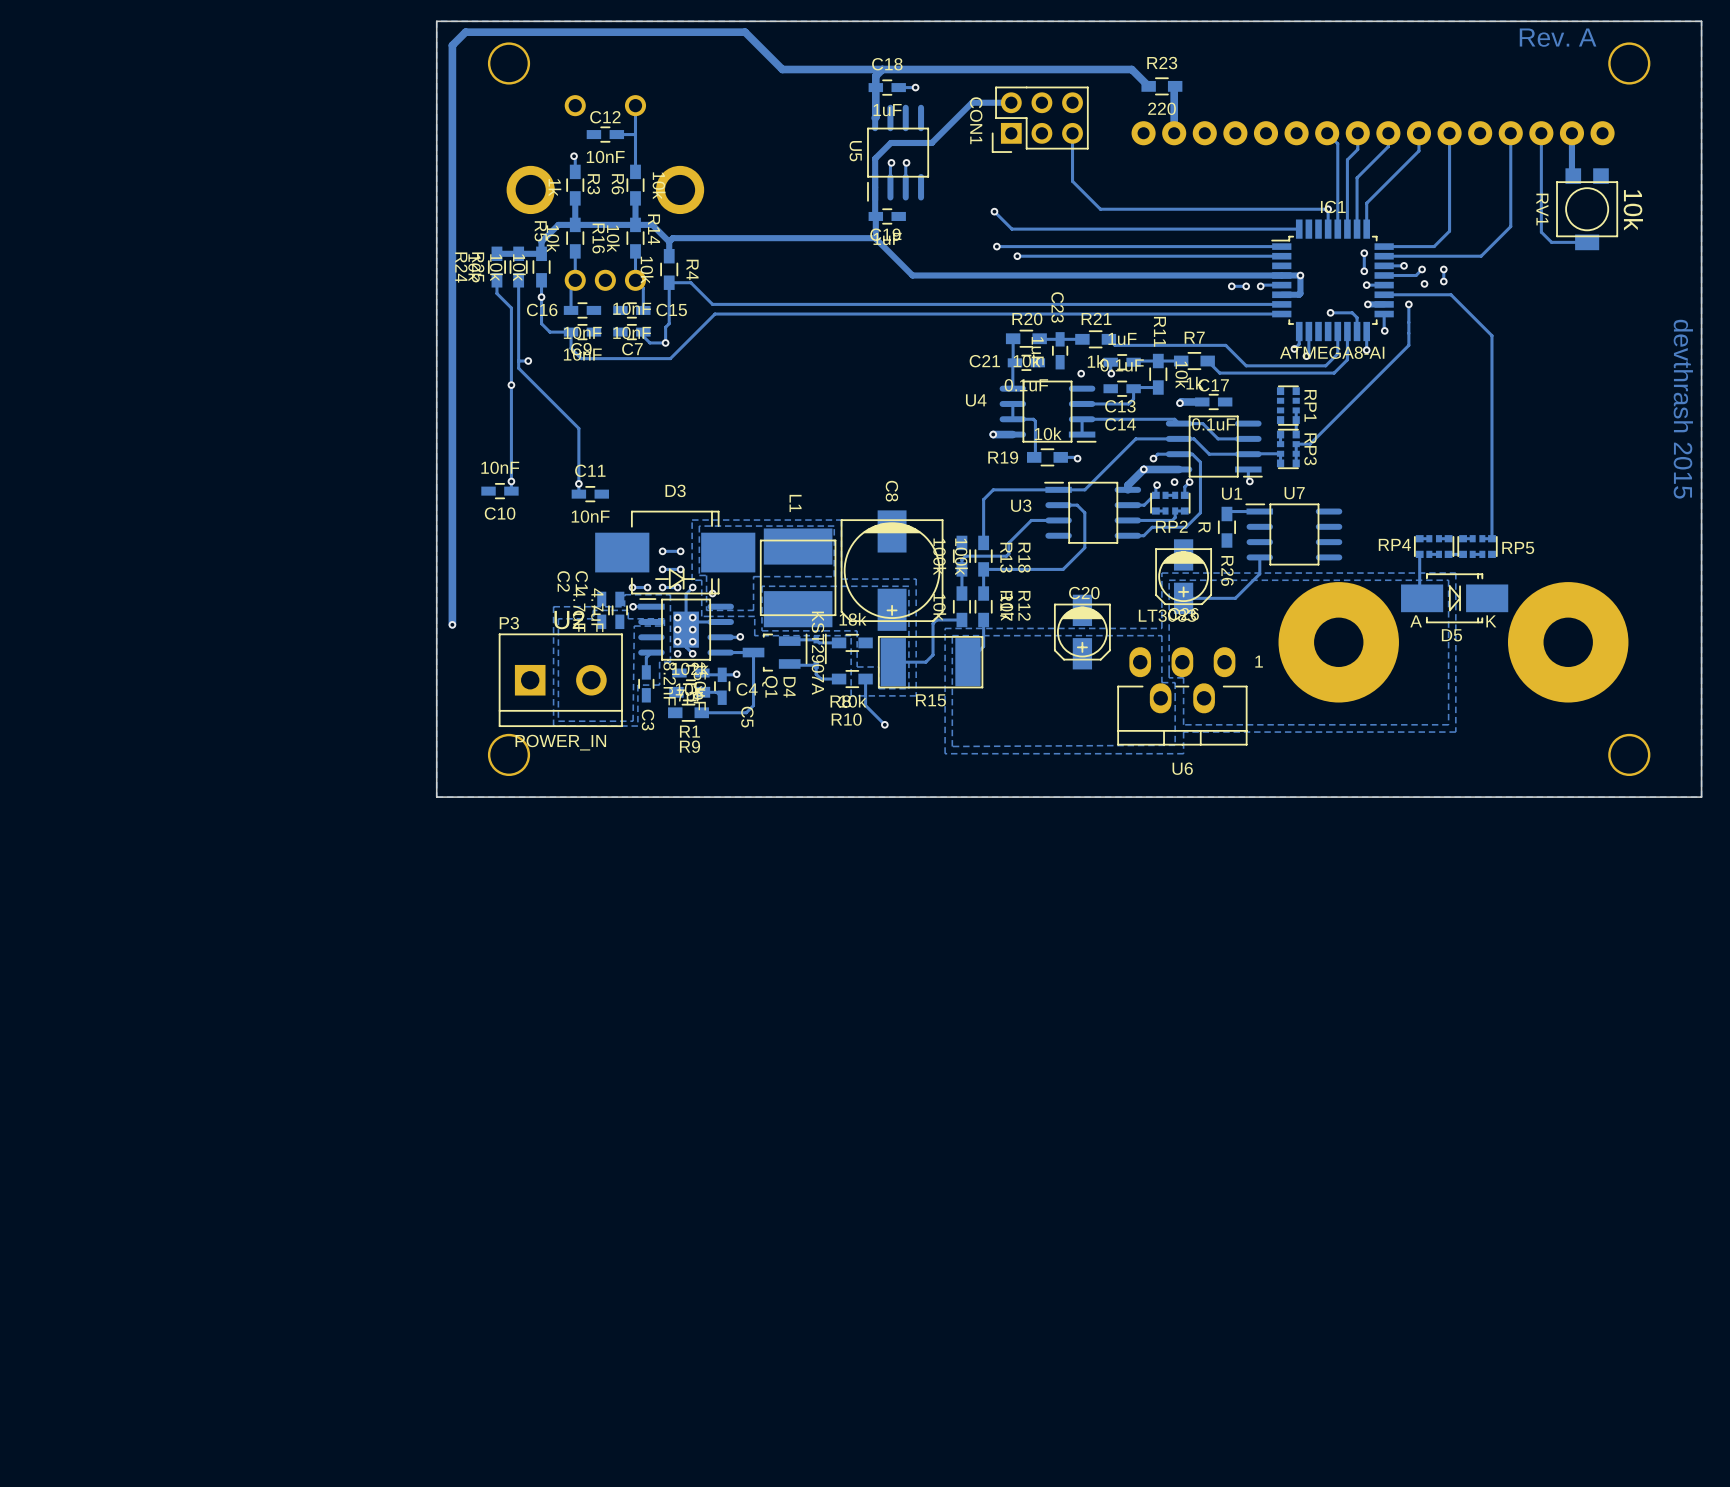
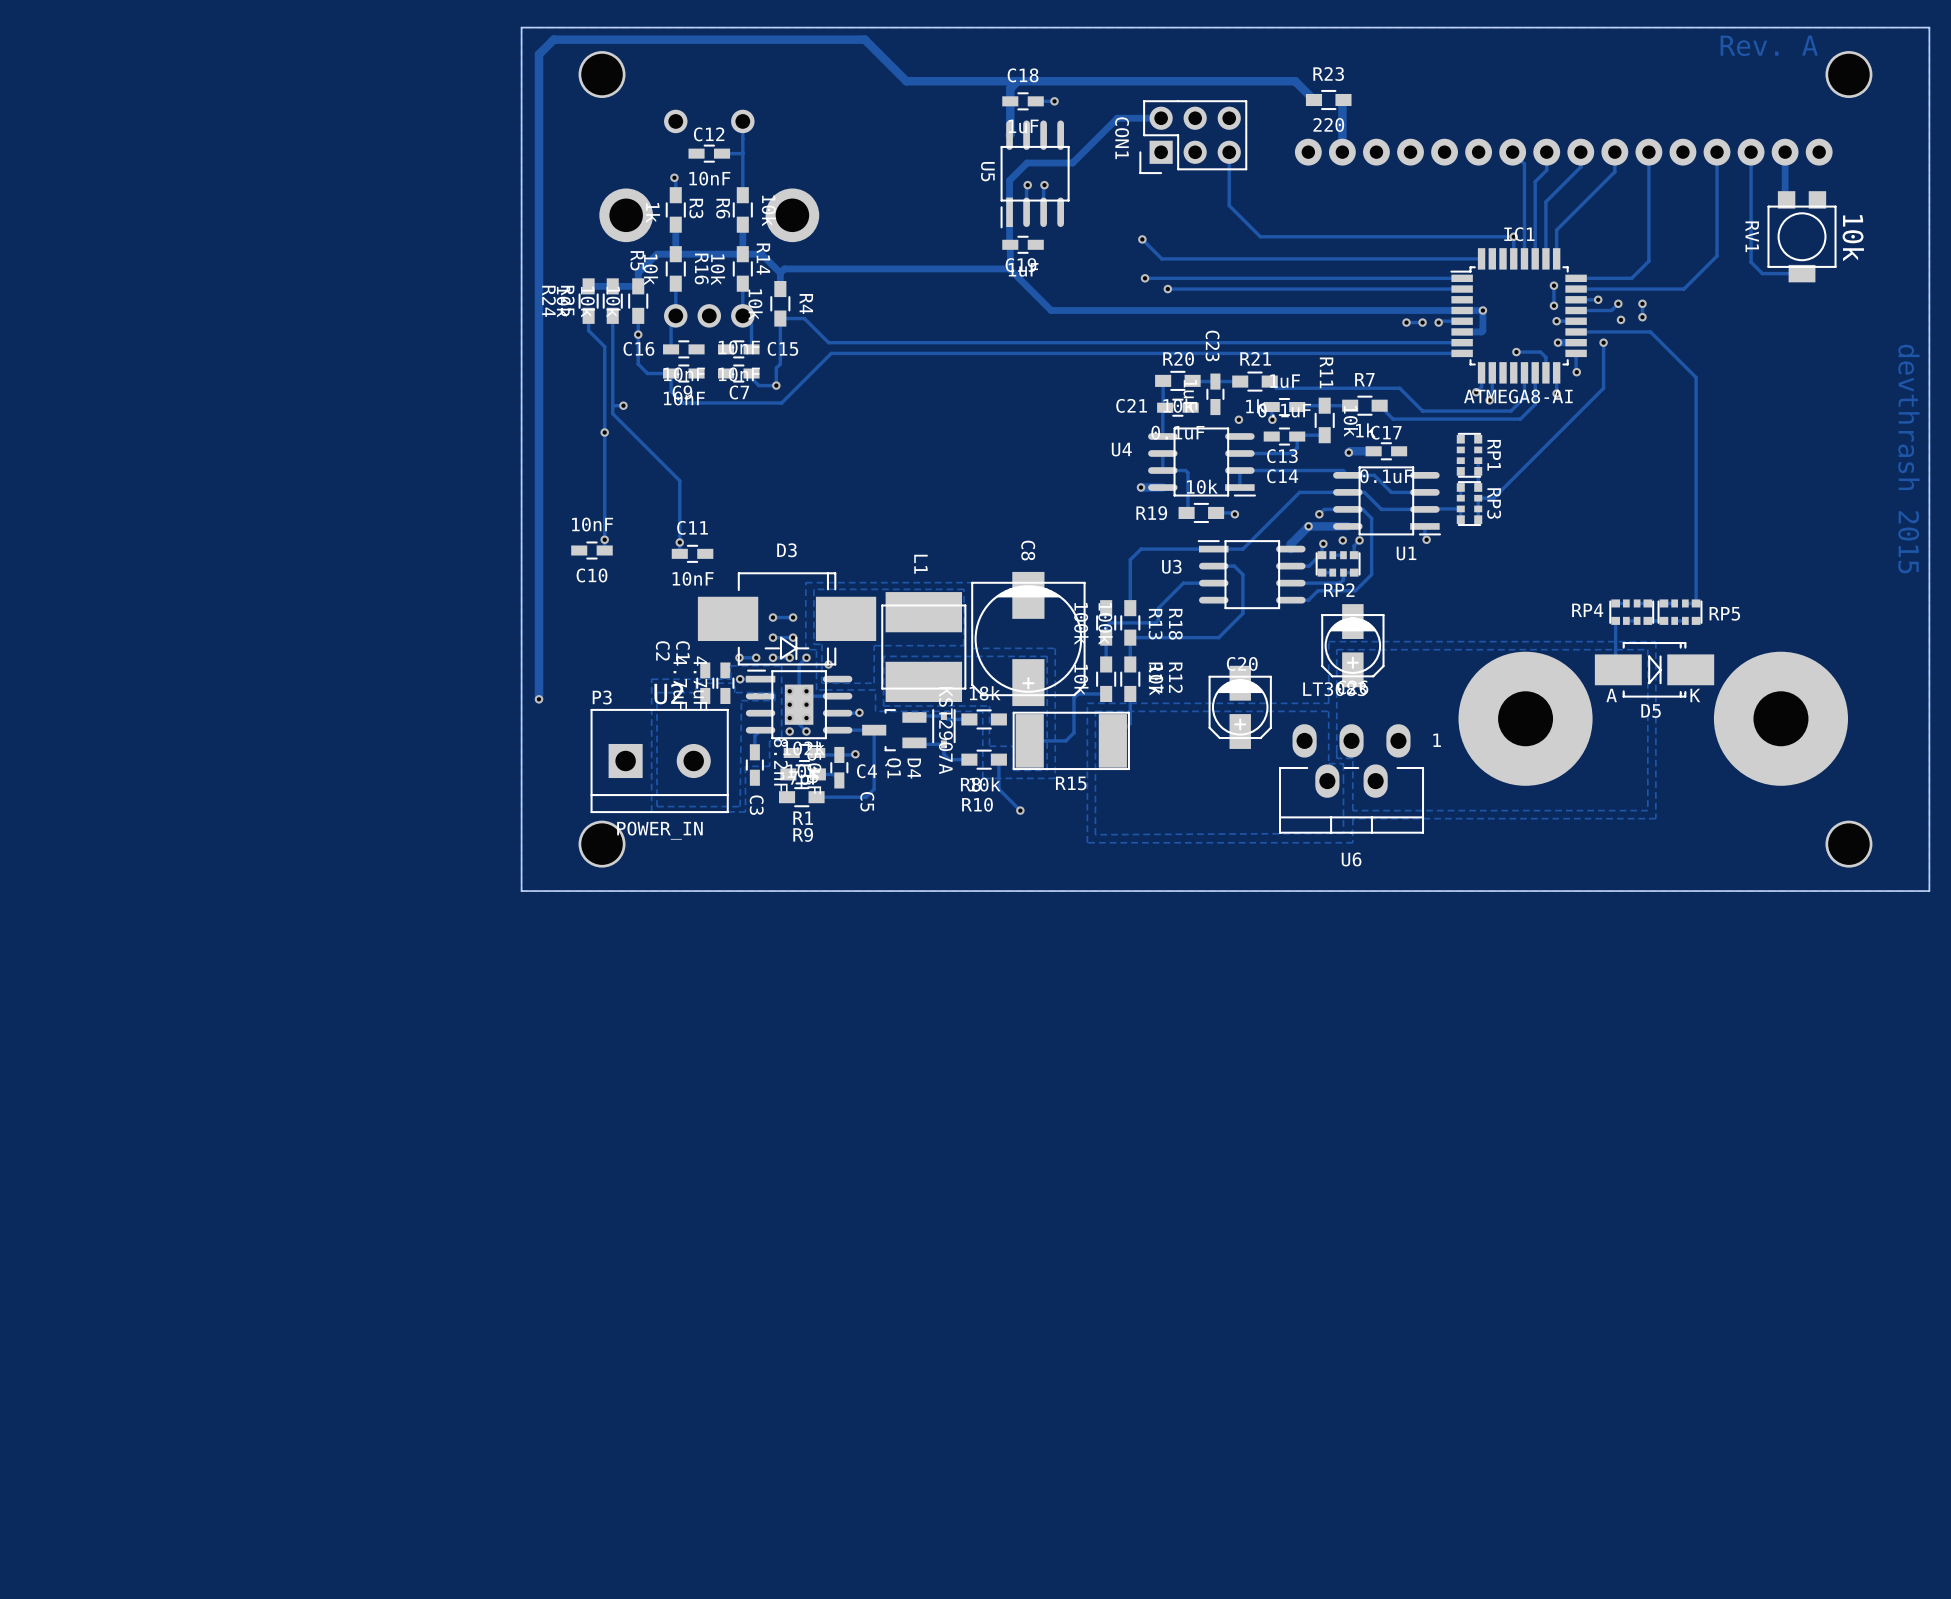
track: (1259, 511) (1229, 511) (1226, 514) -> none
R26: R (1226, 527) -> none
U7: (1293, 534) -> none
track: (1259, 557) (1259, 573) (1235, 598) (1183, 598) -> none

